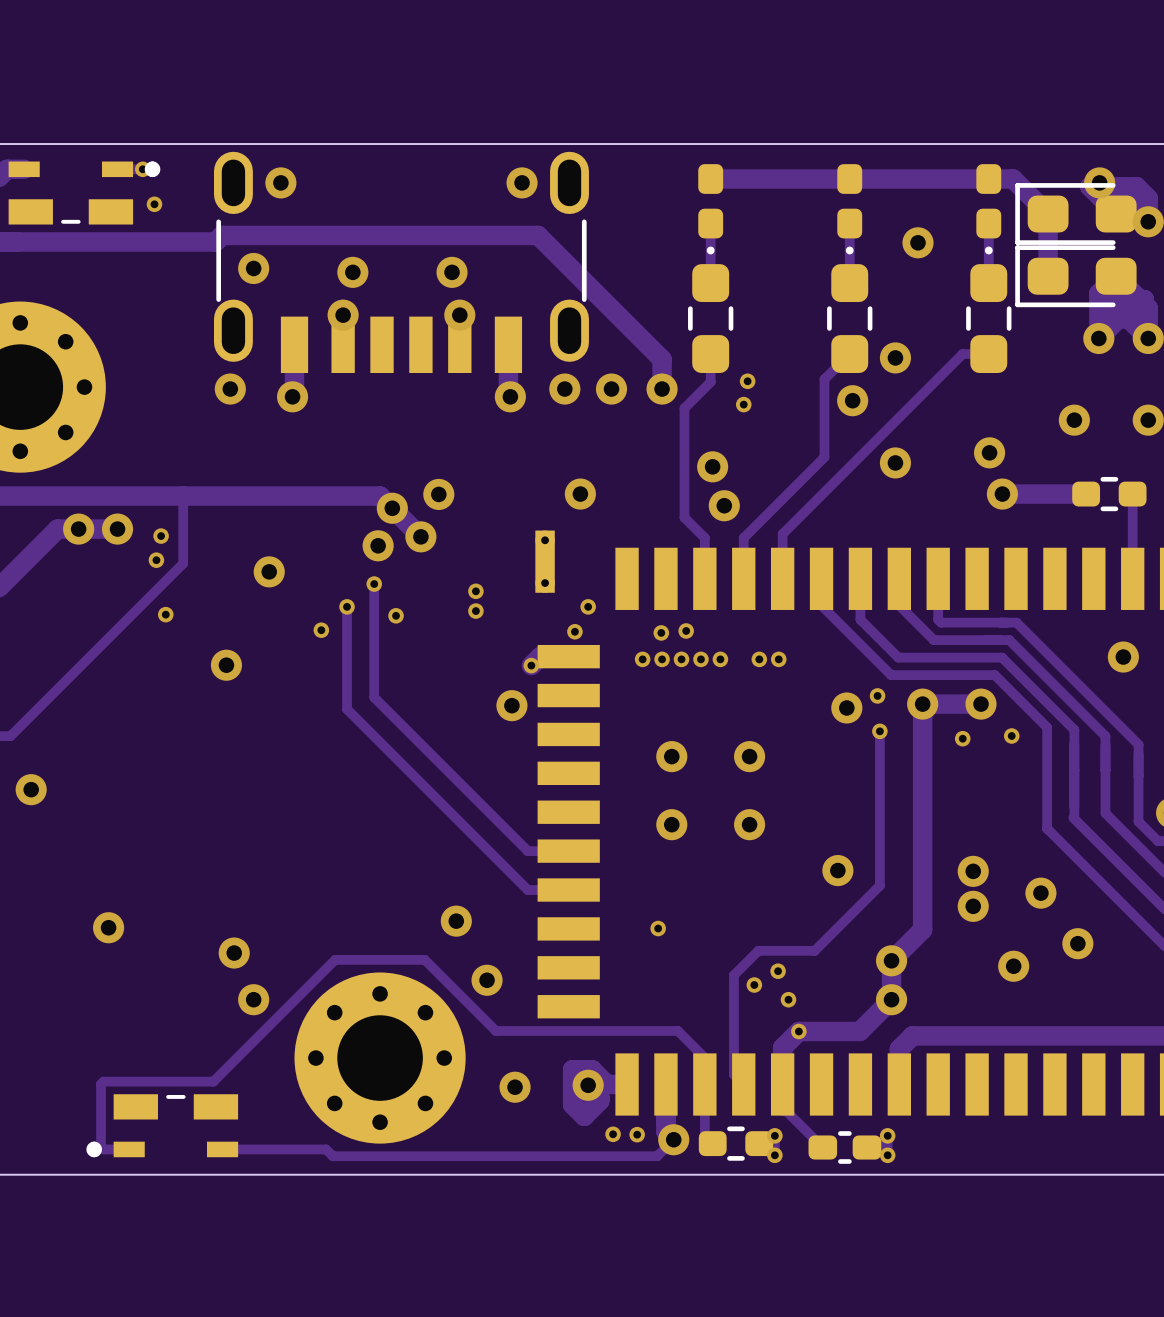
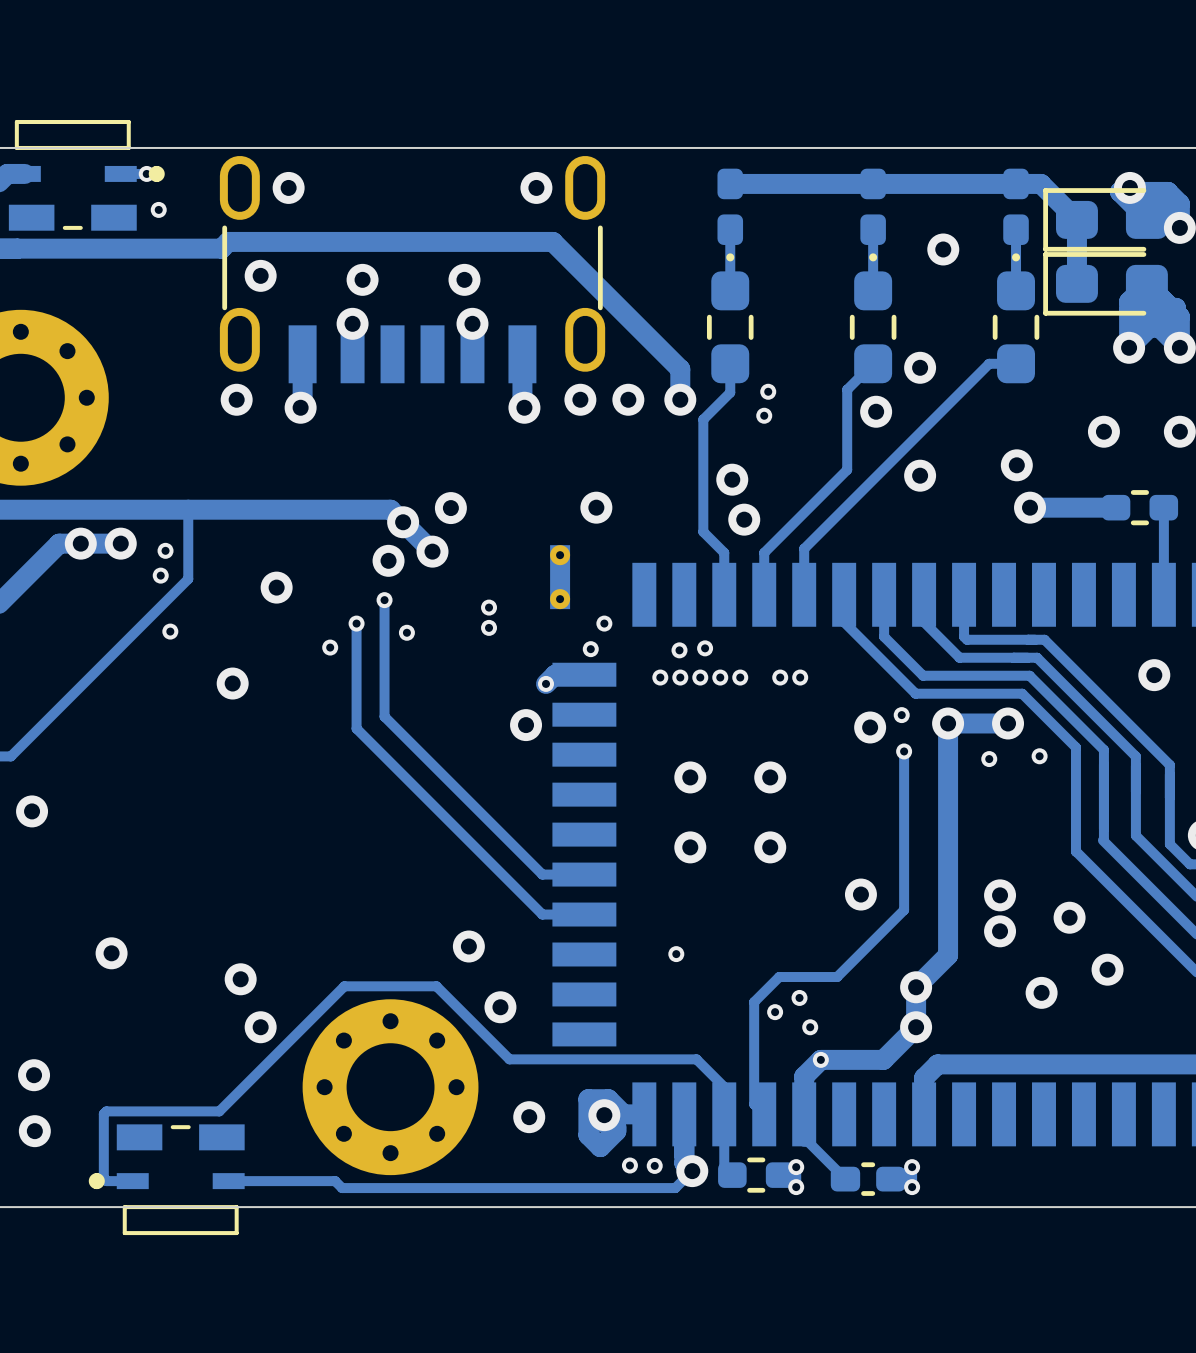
part footprint: [8, 161, 161, 225] -> [8, 119, 165, 231]
via: none -> (34, 1075)
part footprint: [86, 1094, 239, 1158] -> [88, 1124, 245, 1236]
via: none -> (34, 1131)

